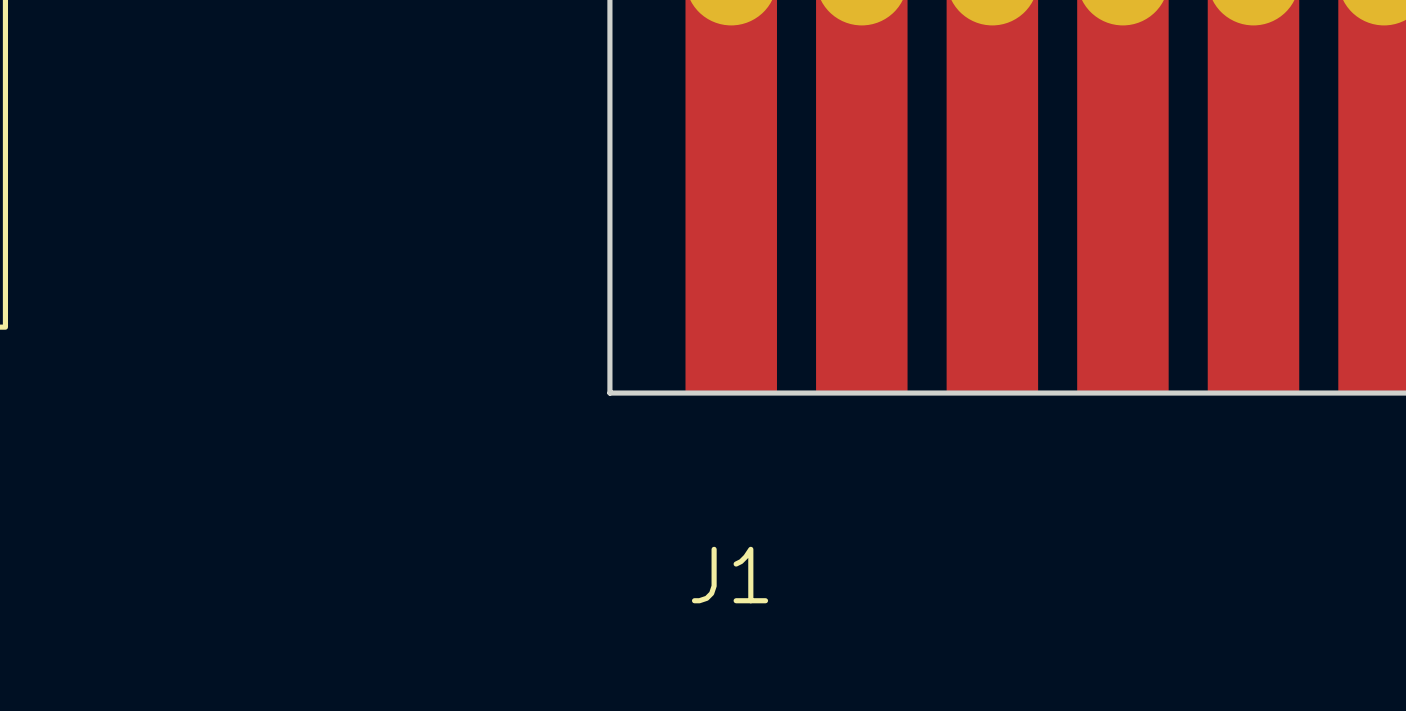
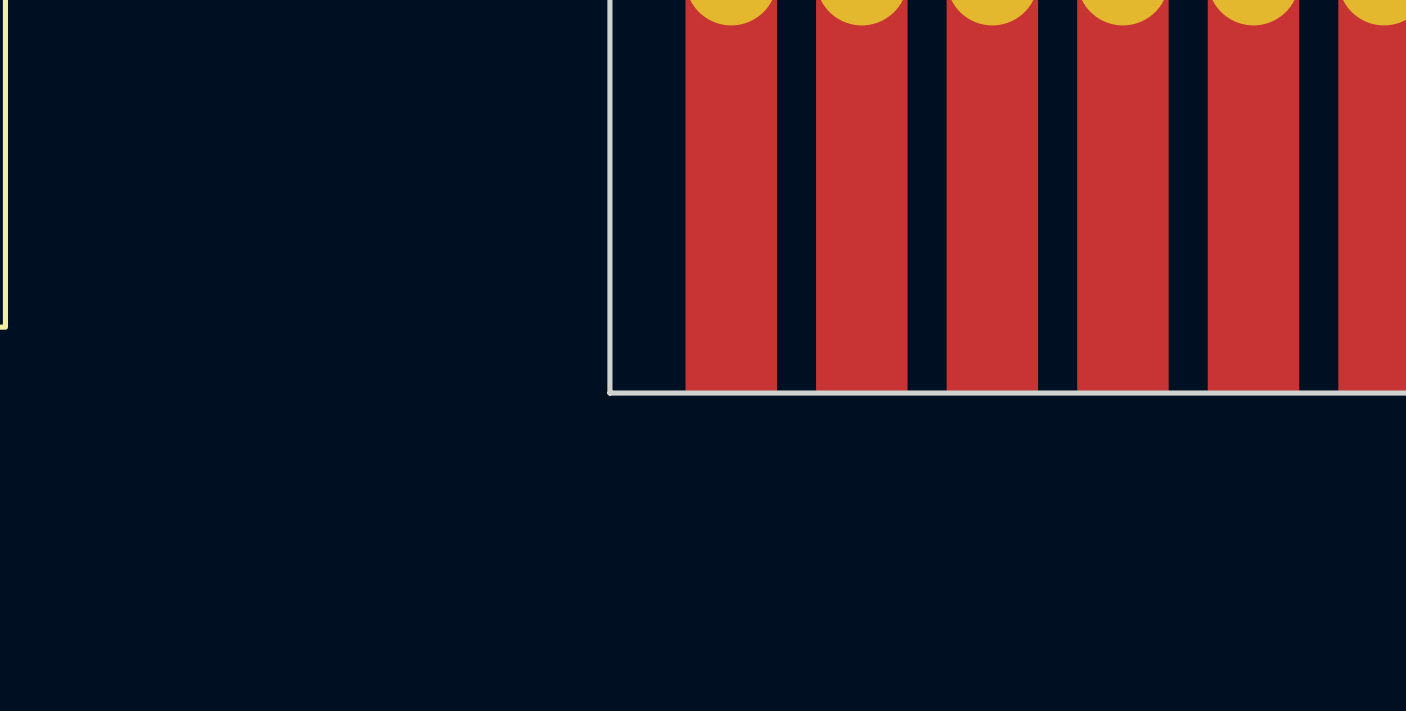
J1 name: J1 (730, 575) -> none

